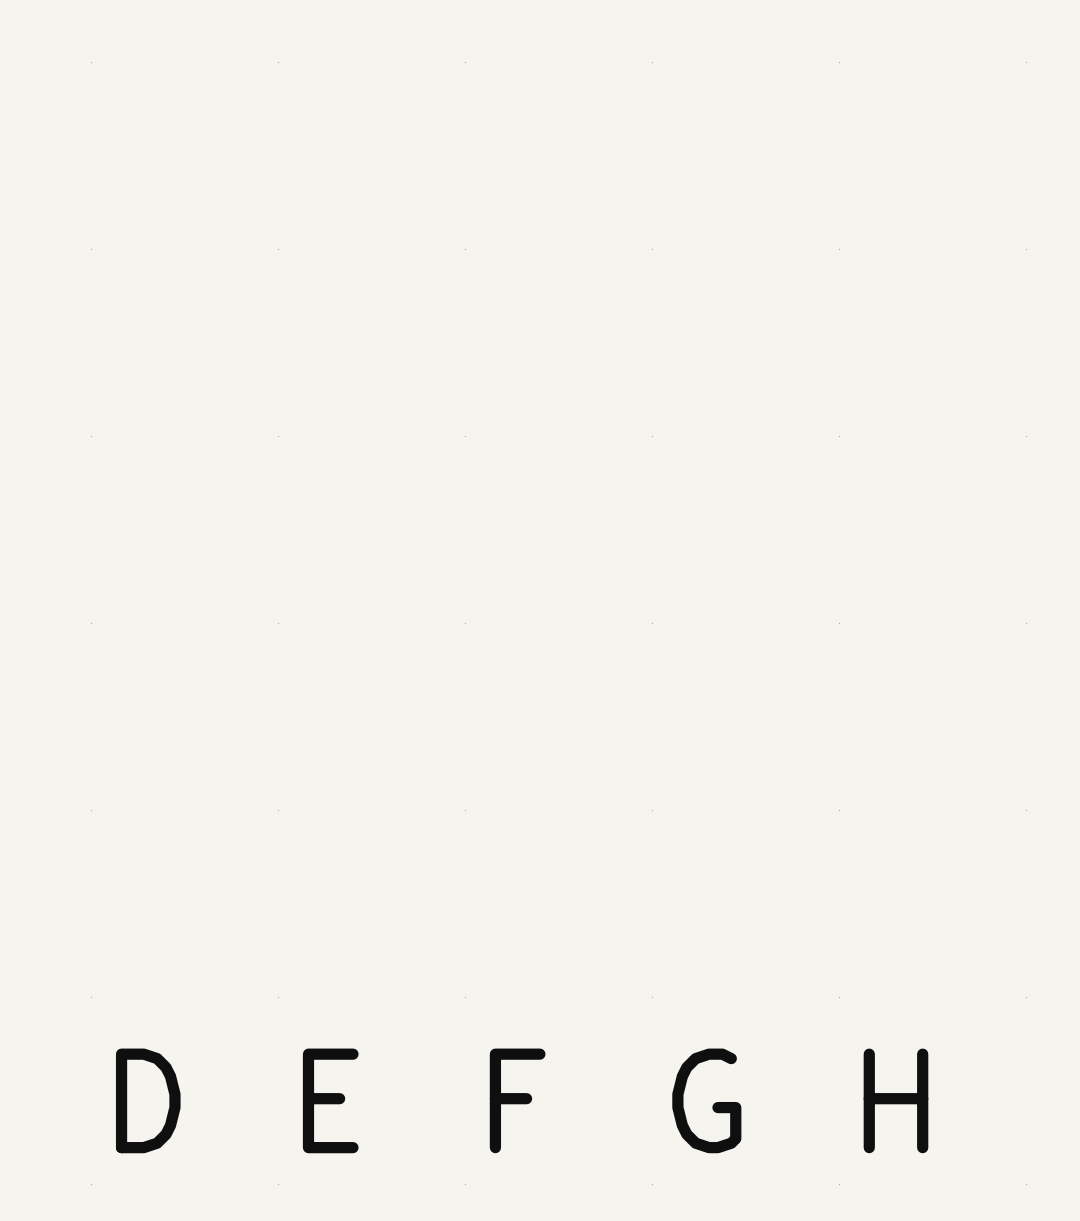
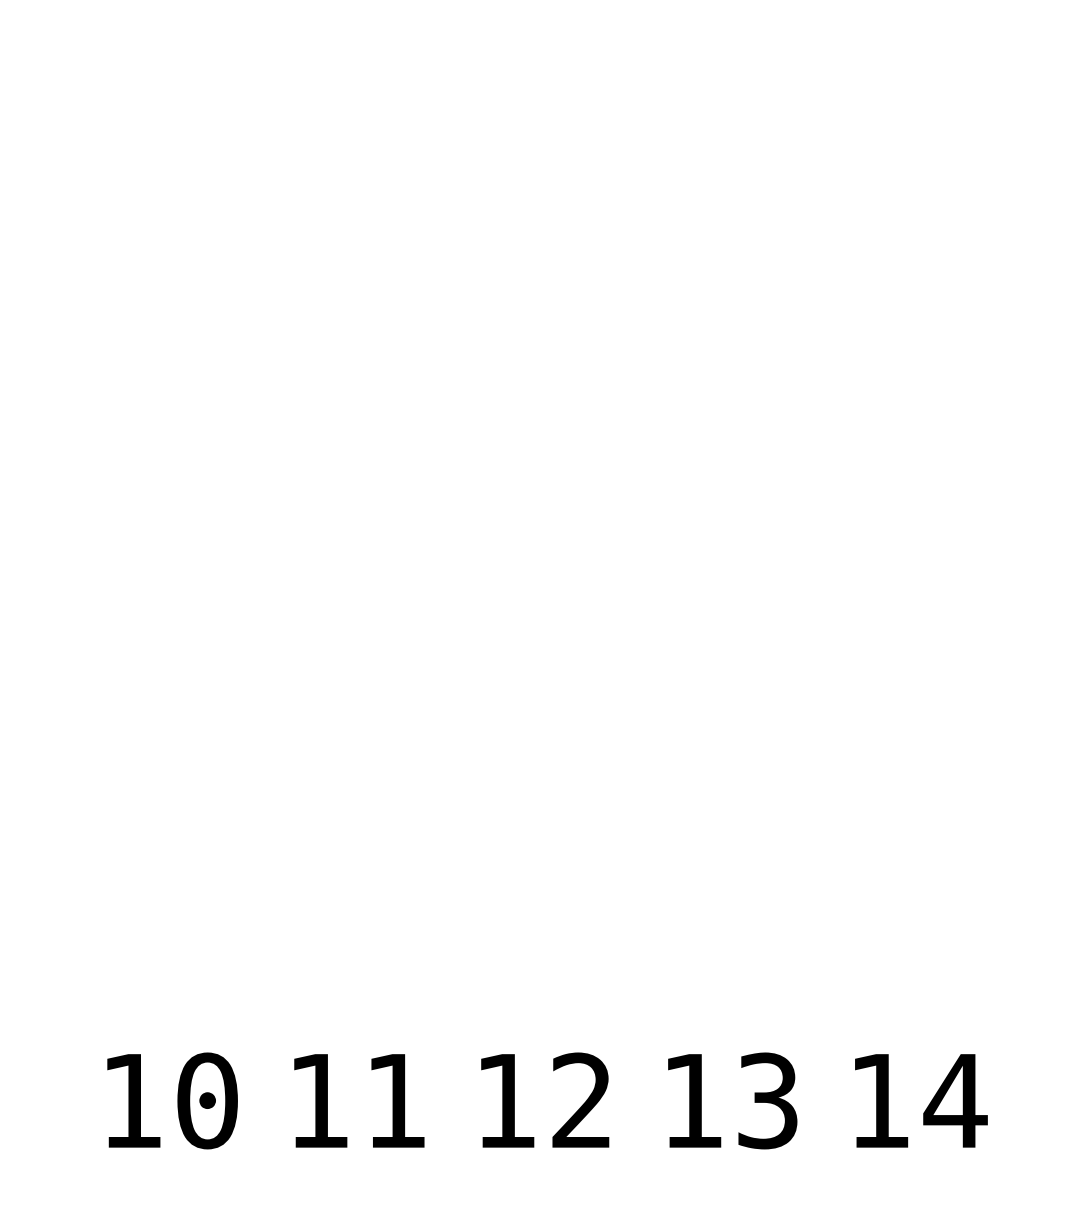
label: D (148, 1100) -> 10 (172, 1100)
label: E (330, 1100) -> 11 (359, 1100)
label: F (517, 1100) -> 12 (545, 1100)
label: G (706, 1100) -> 13 (732, 1100)
label: H (895, 1100) -> 14 (921, 1100)

